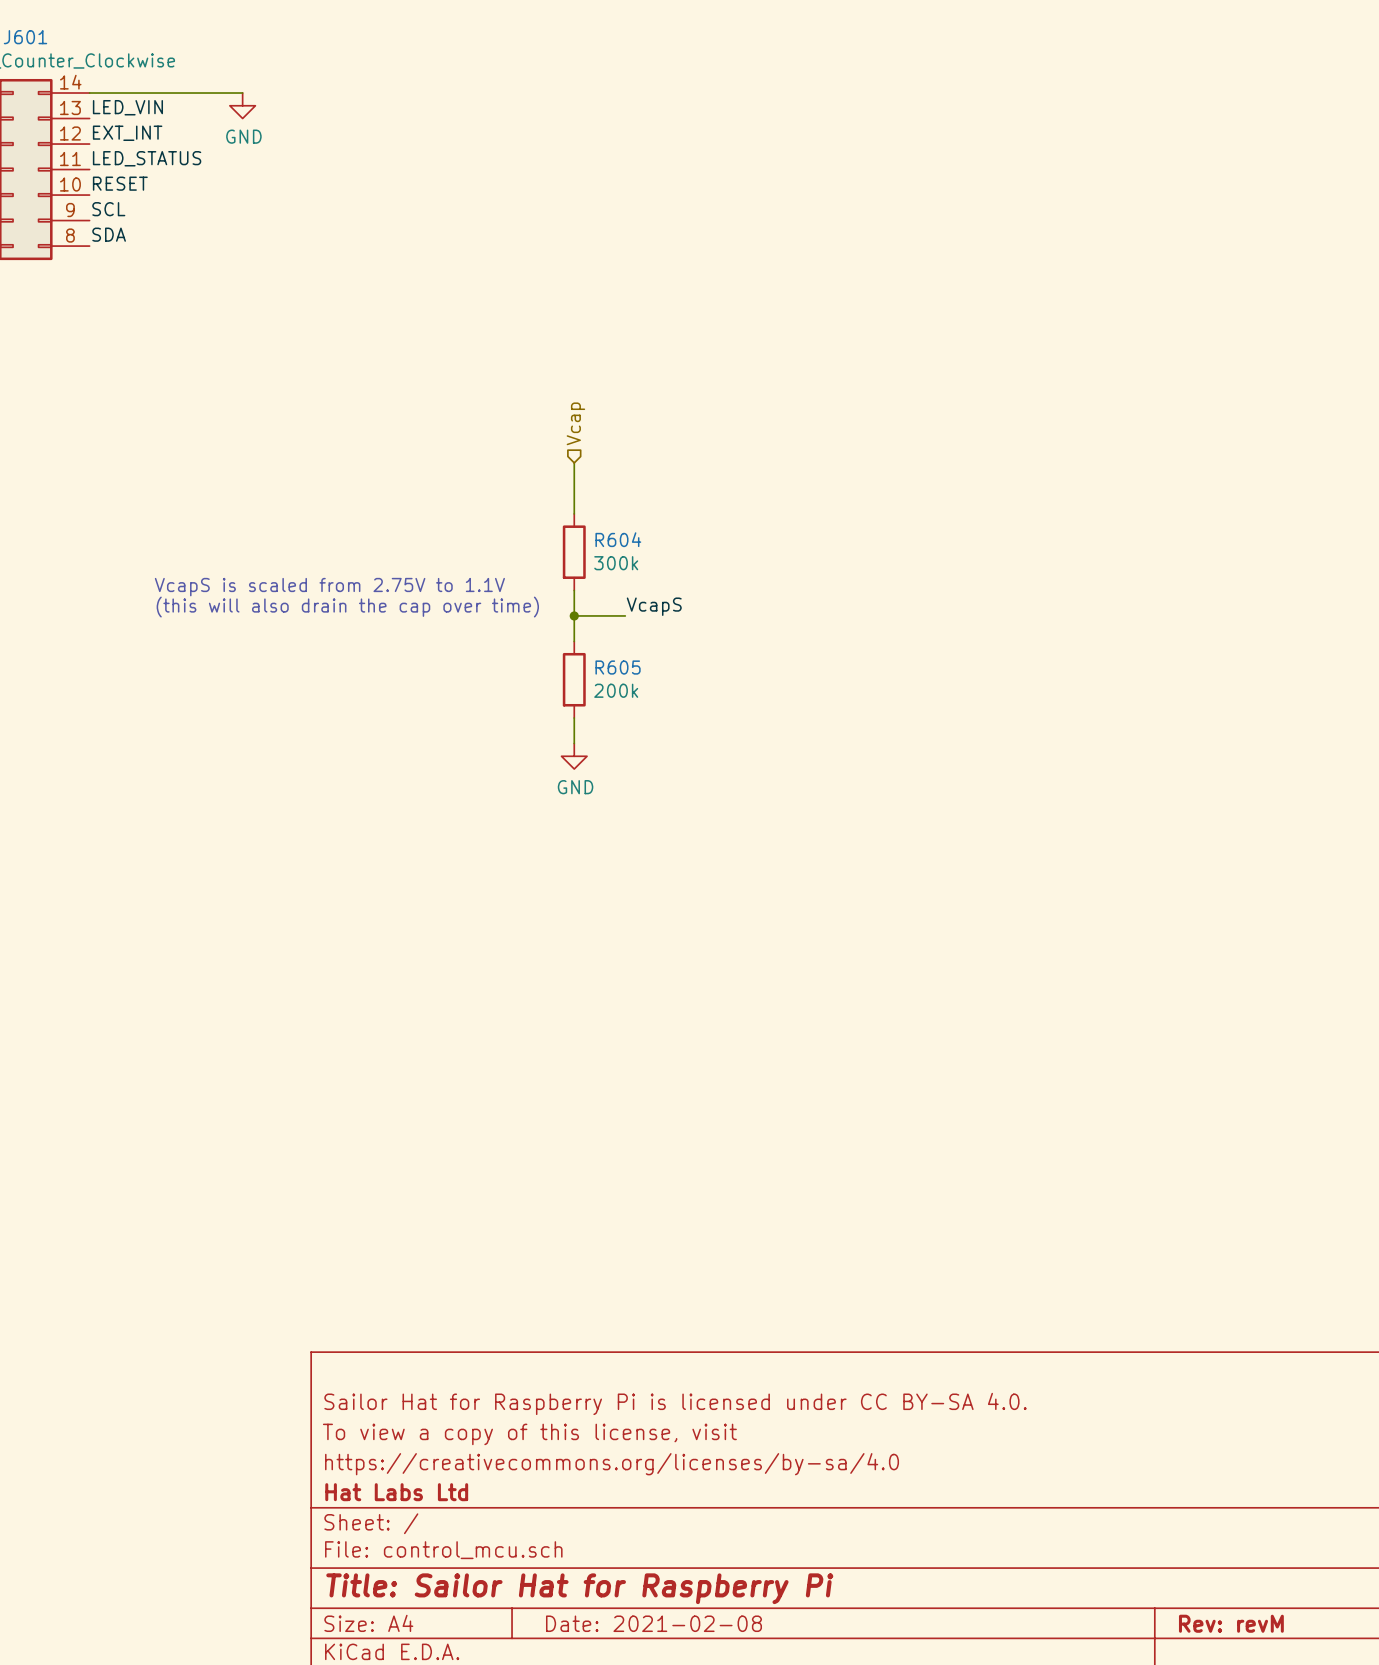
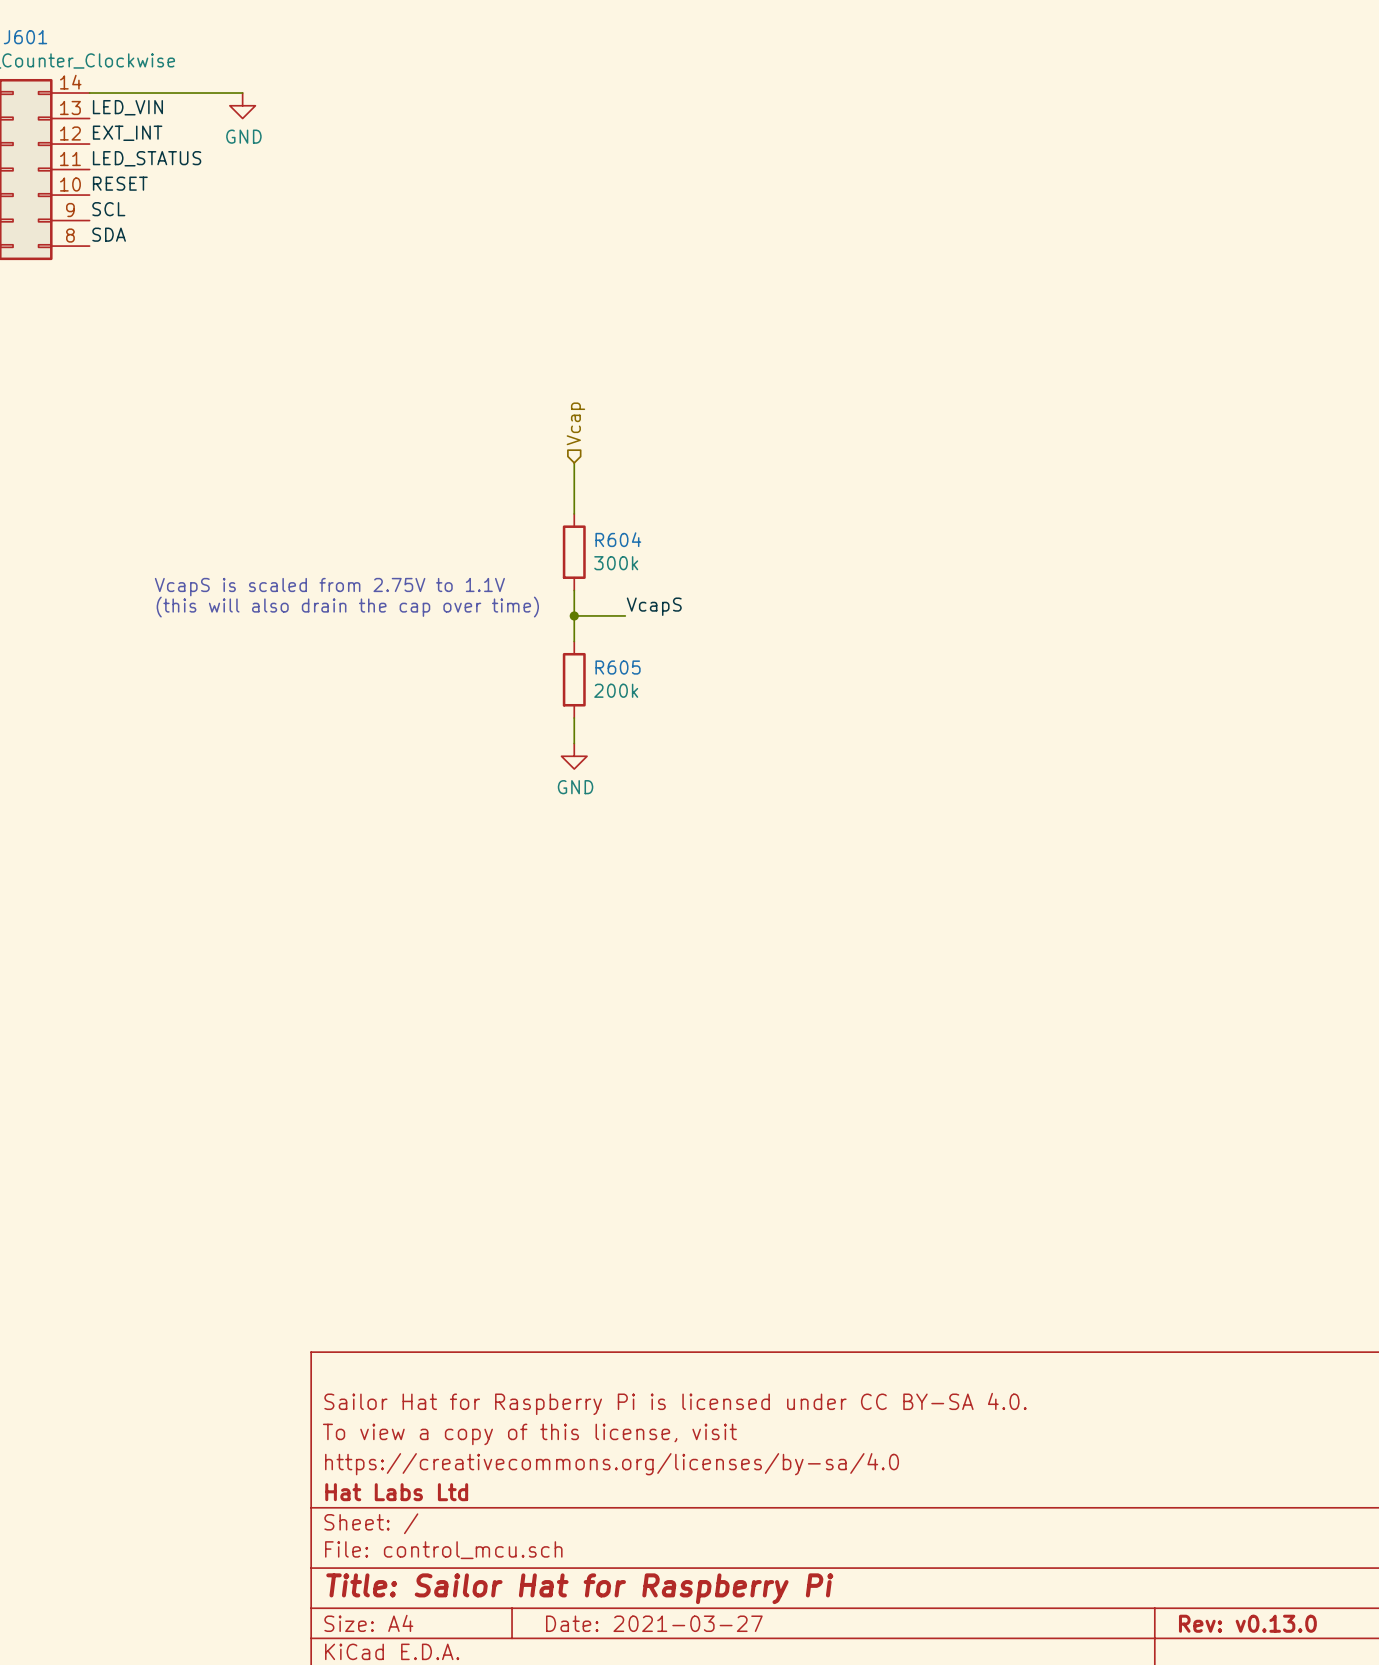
title block: Date: 2021-02-08 (654, 1623) -> Date: 2021-03-27 (654, 1623)
title block: Rev: revM (1231, 1623) -> Rev: v0.13.0 (1247, 1623)

